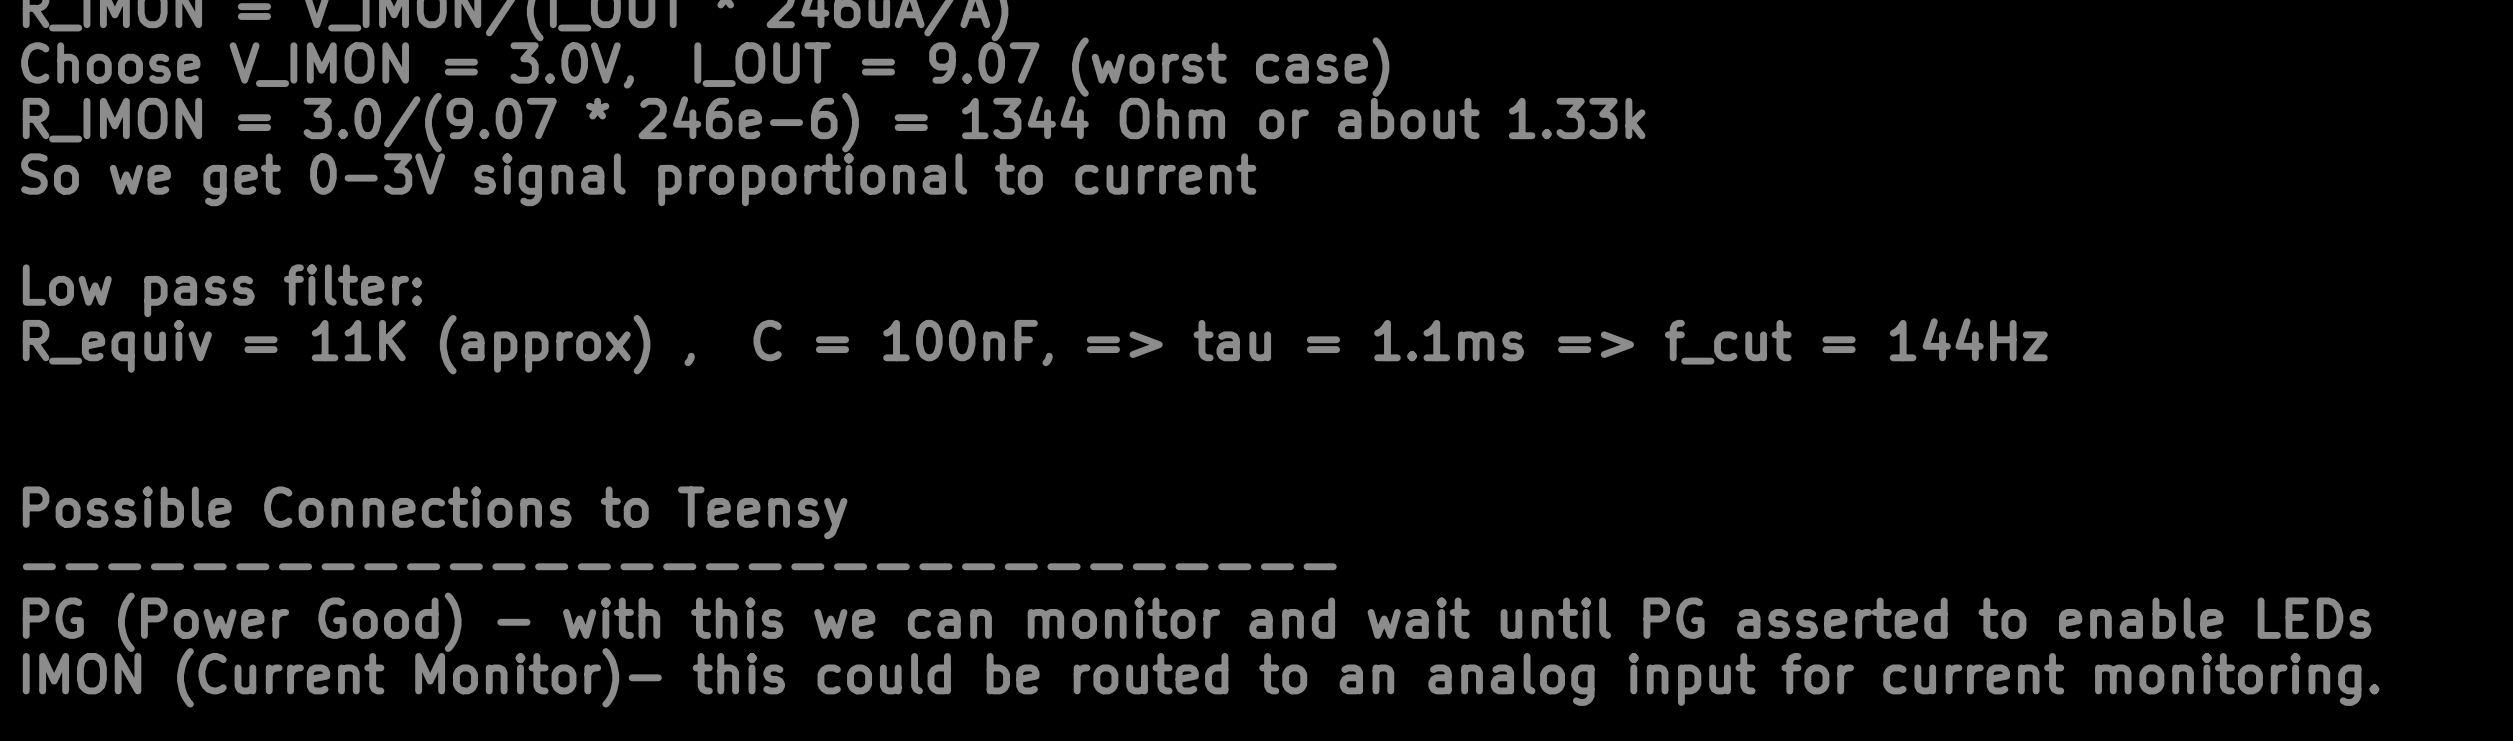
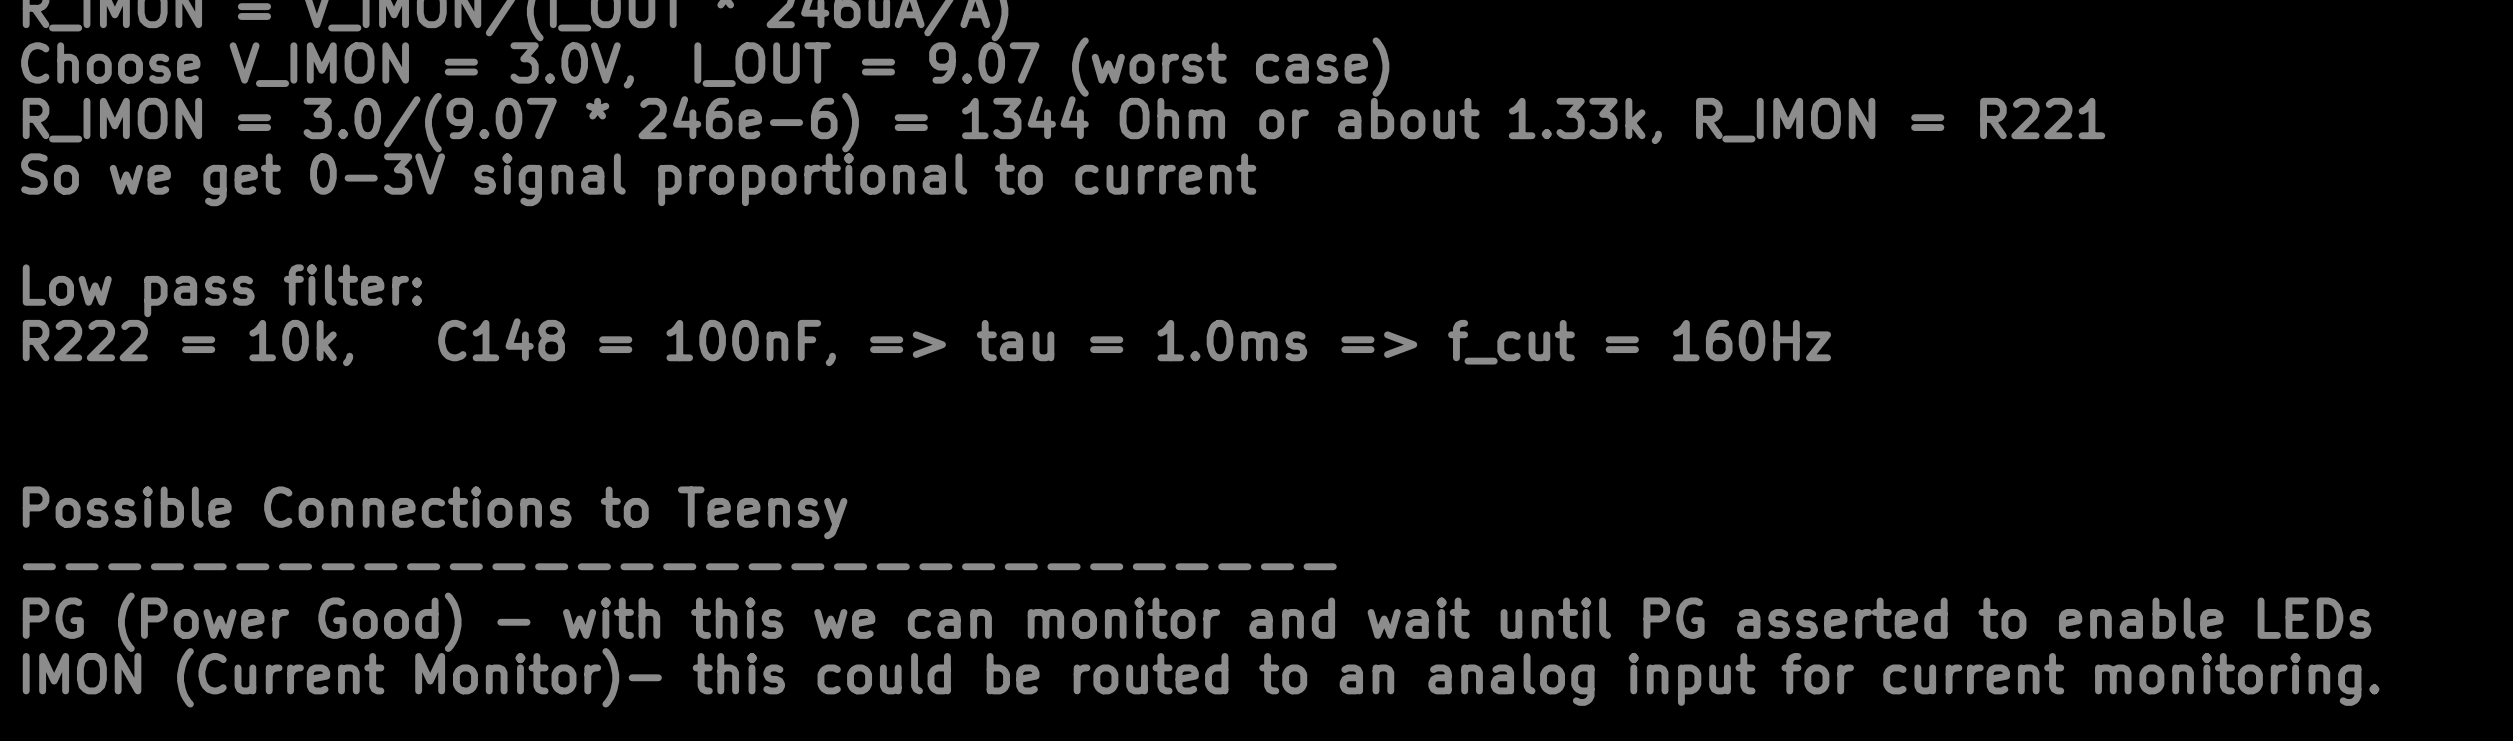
text: R_IMON = 3.0/(9.07 * 246e-6) = 1344 Ohm or about 1.33k (834, 122) -> R_IMON = 3.0/(9.07 * 246e-6) = 1344 Ohm or about 1.33k, R_IMON = R221 (1064, 122)
text: R_equiv = 11K (approx) , C = 100nF, => tau = 1.1ms => f_cut = 144Hz (1035, 344) -> R222 = 10k, C148 = 100nF, => tau = 1.0ms => f_cut = 160Hz (926, 342)

